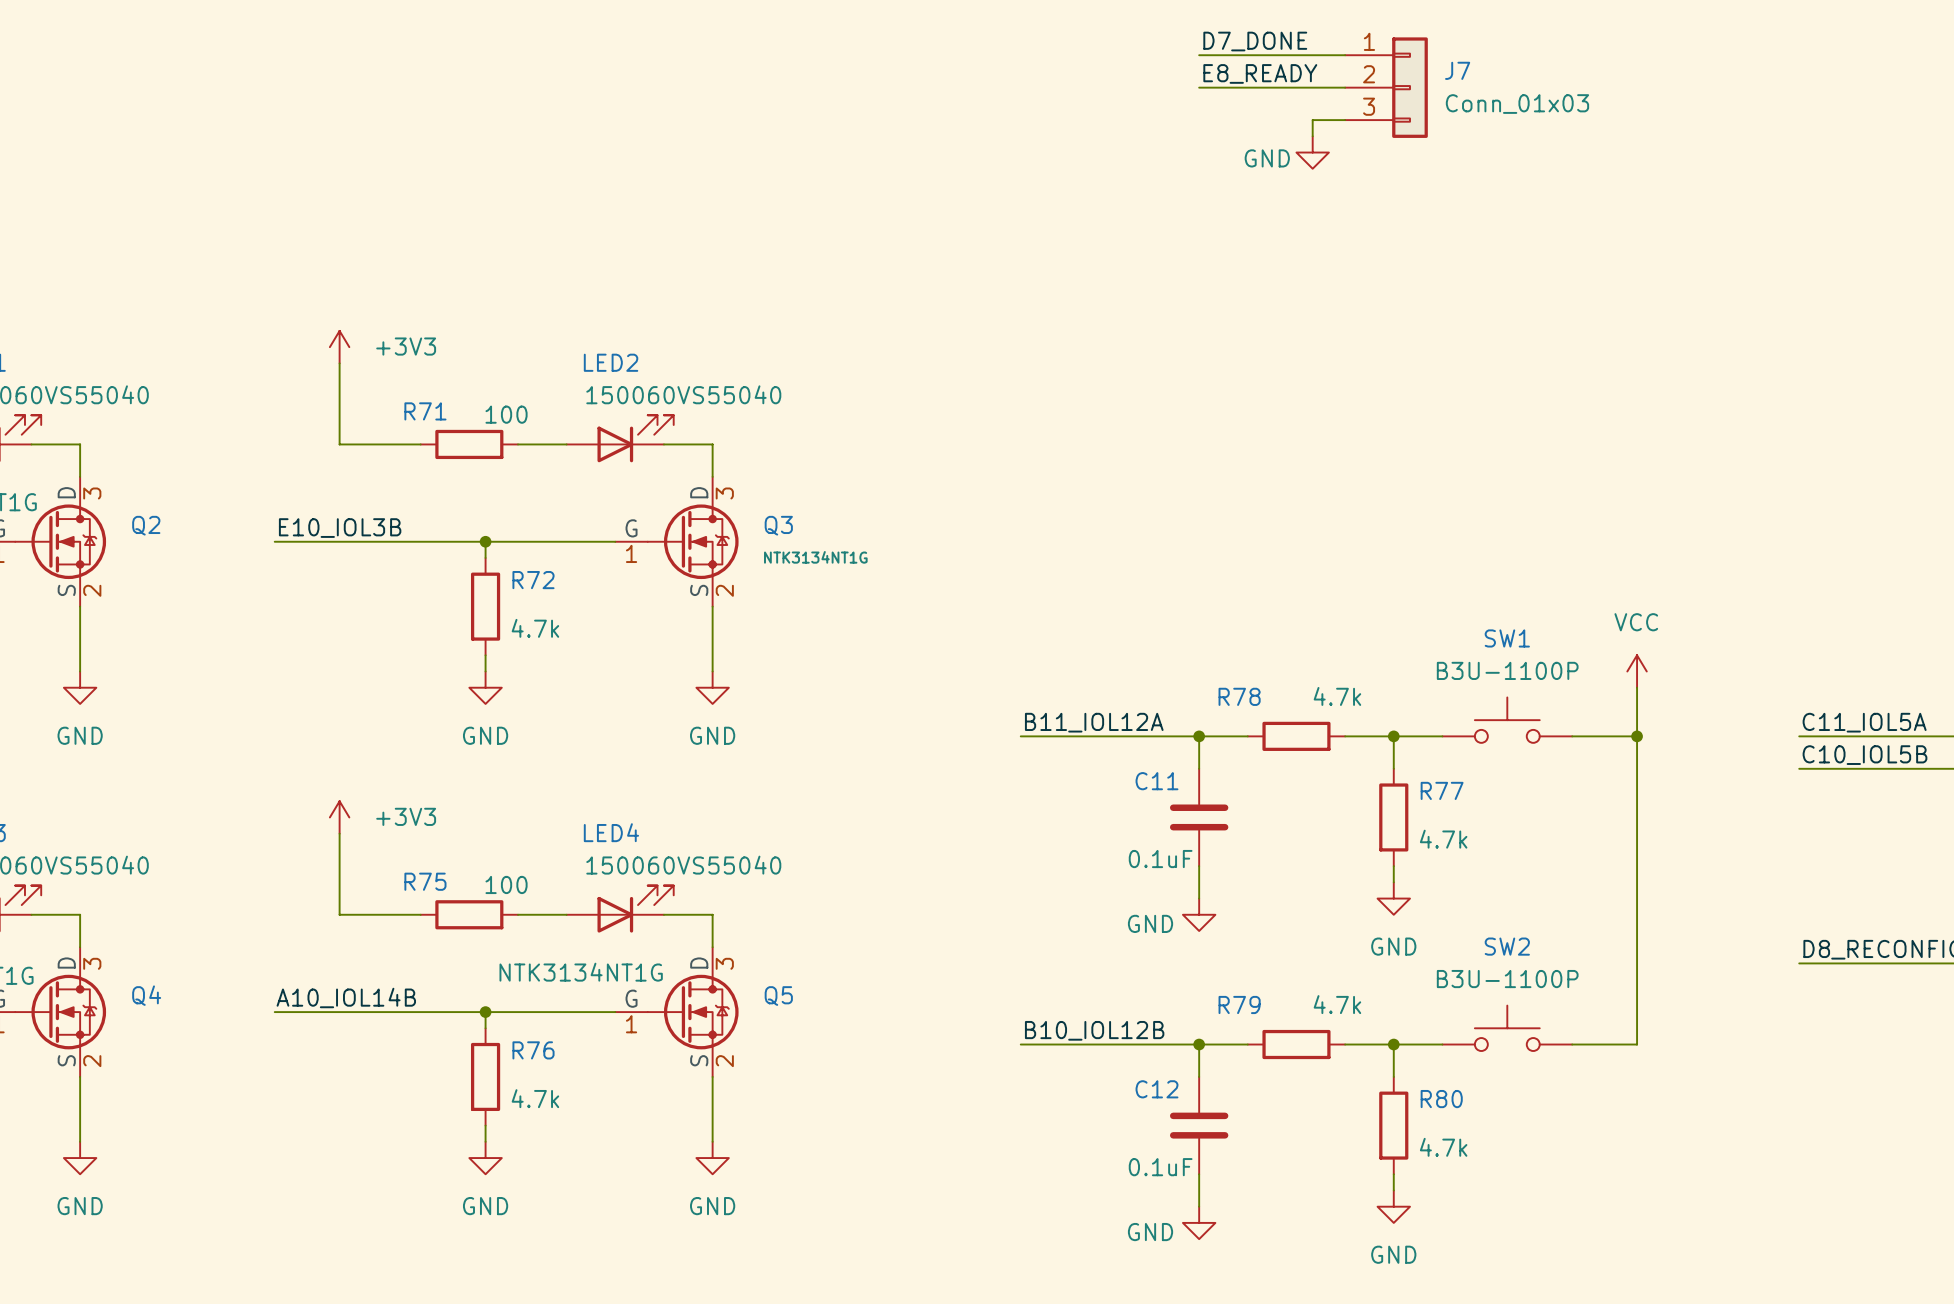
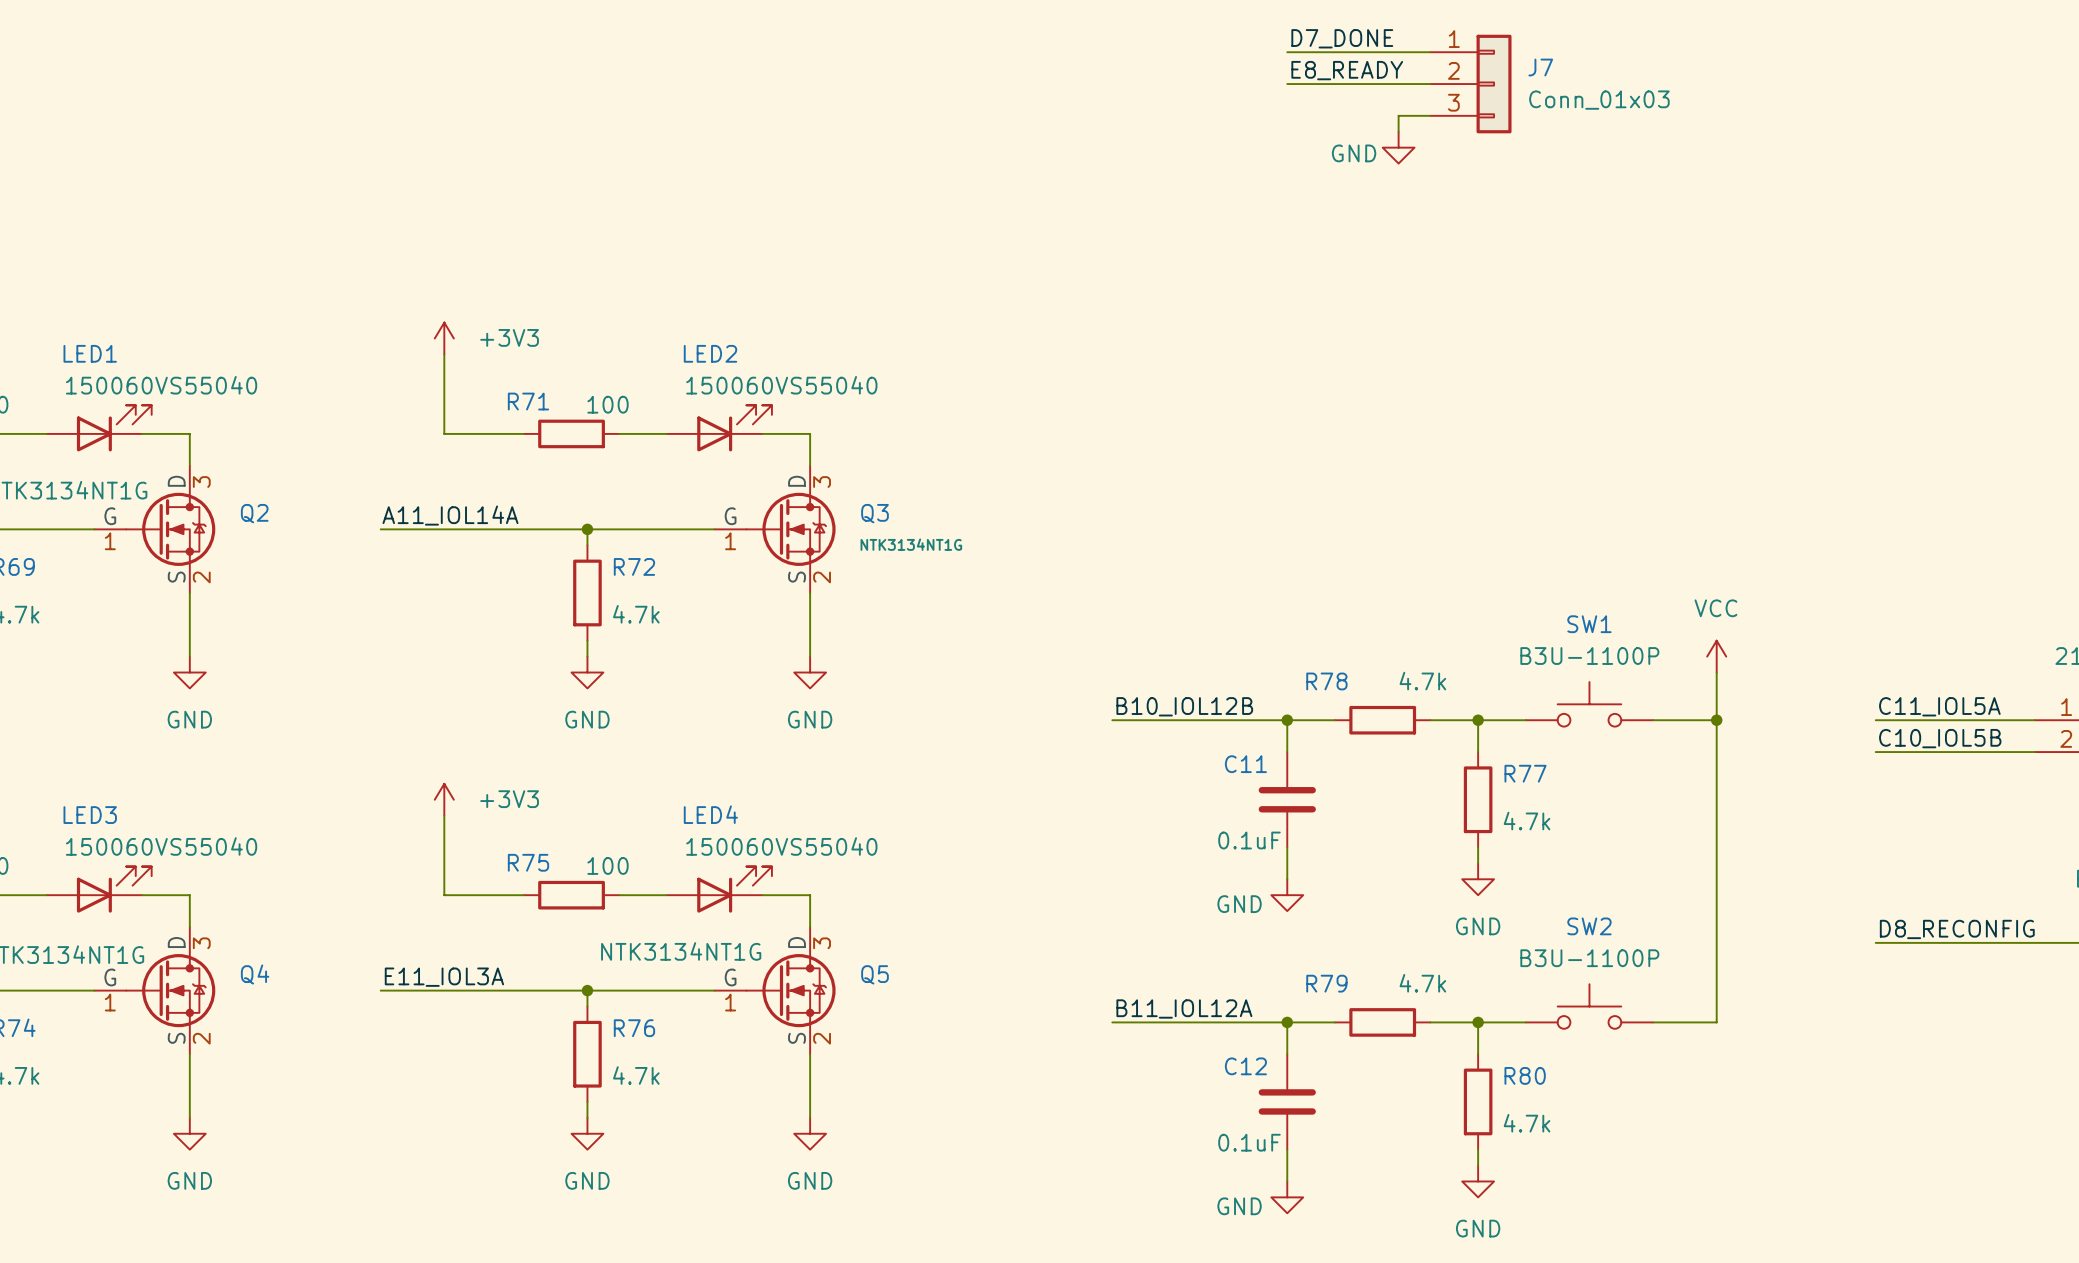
label: E10_IOL3B (340, 528) -> A11_IOL14A (450, 515)
label: B11_IOL12A (1094, 722) -> B10_IOL12B (1184, 706)
label: A10_IOL14B (346, 997) -> E11_IOL3A (444, 977)
label: B10_IOL12B (1094, 1030) -> B11_IOL12A (1184, 1008)

